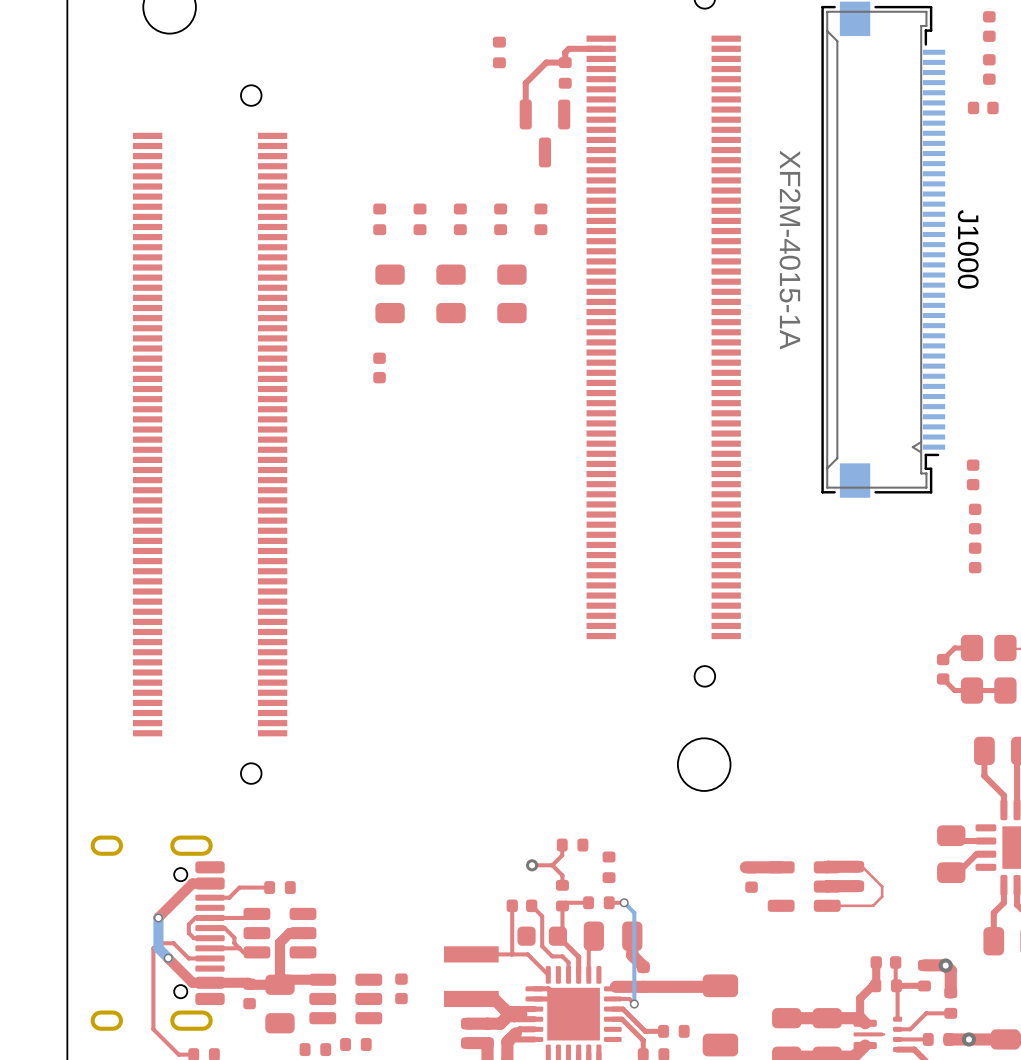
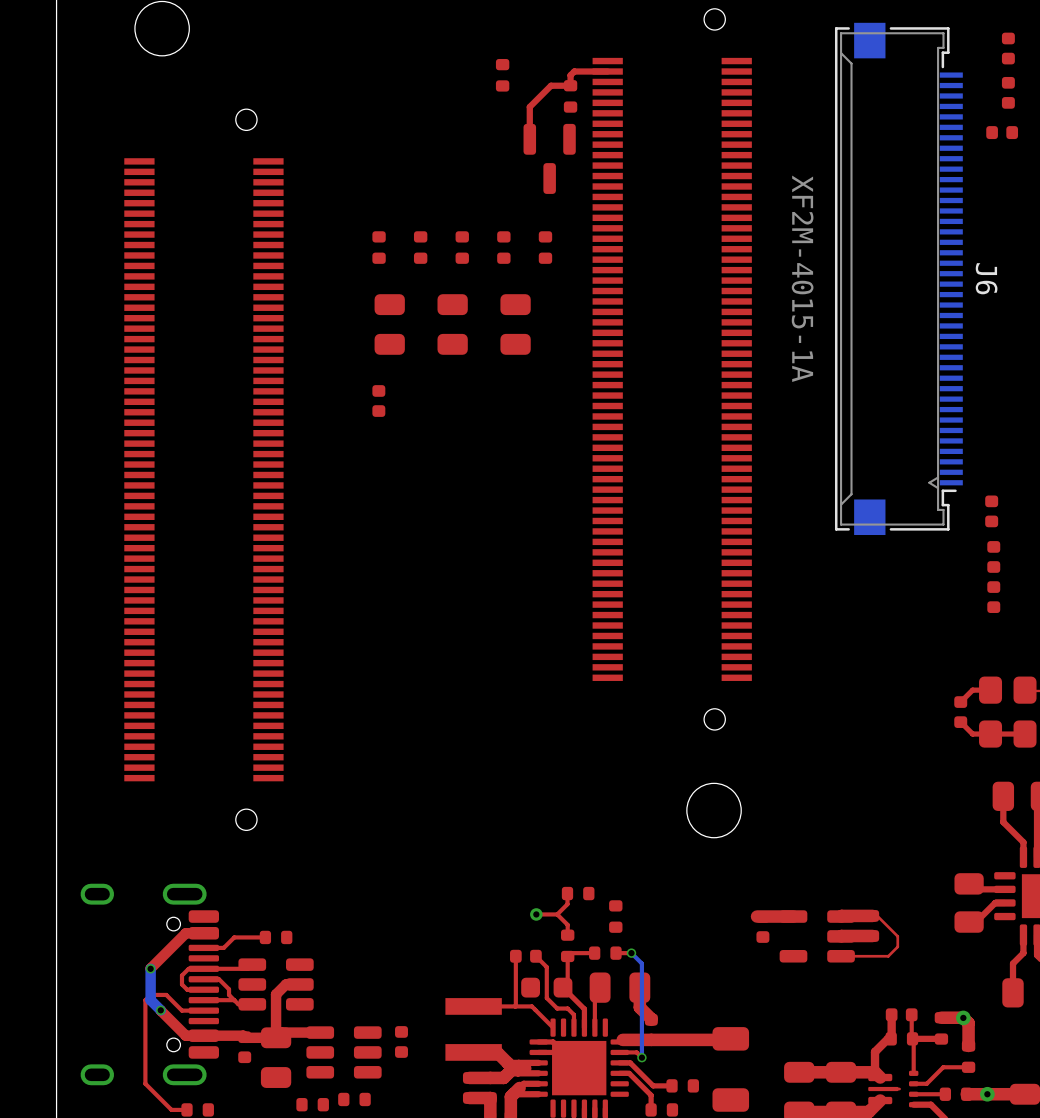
J1000 name: J1000 (968, 249) -> J6 (986, 278)

